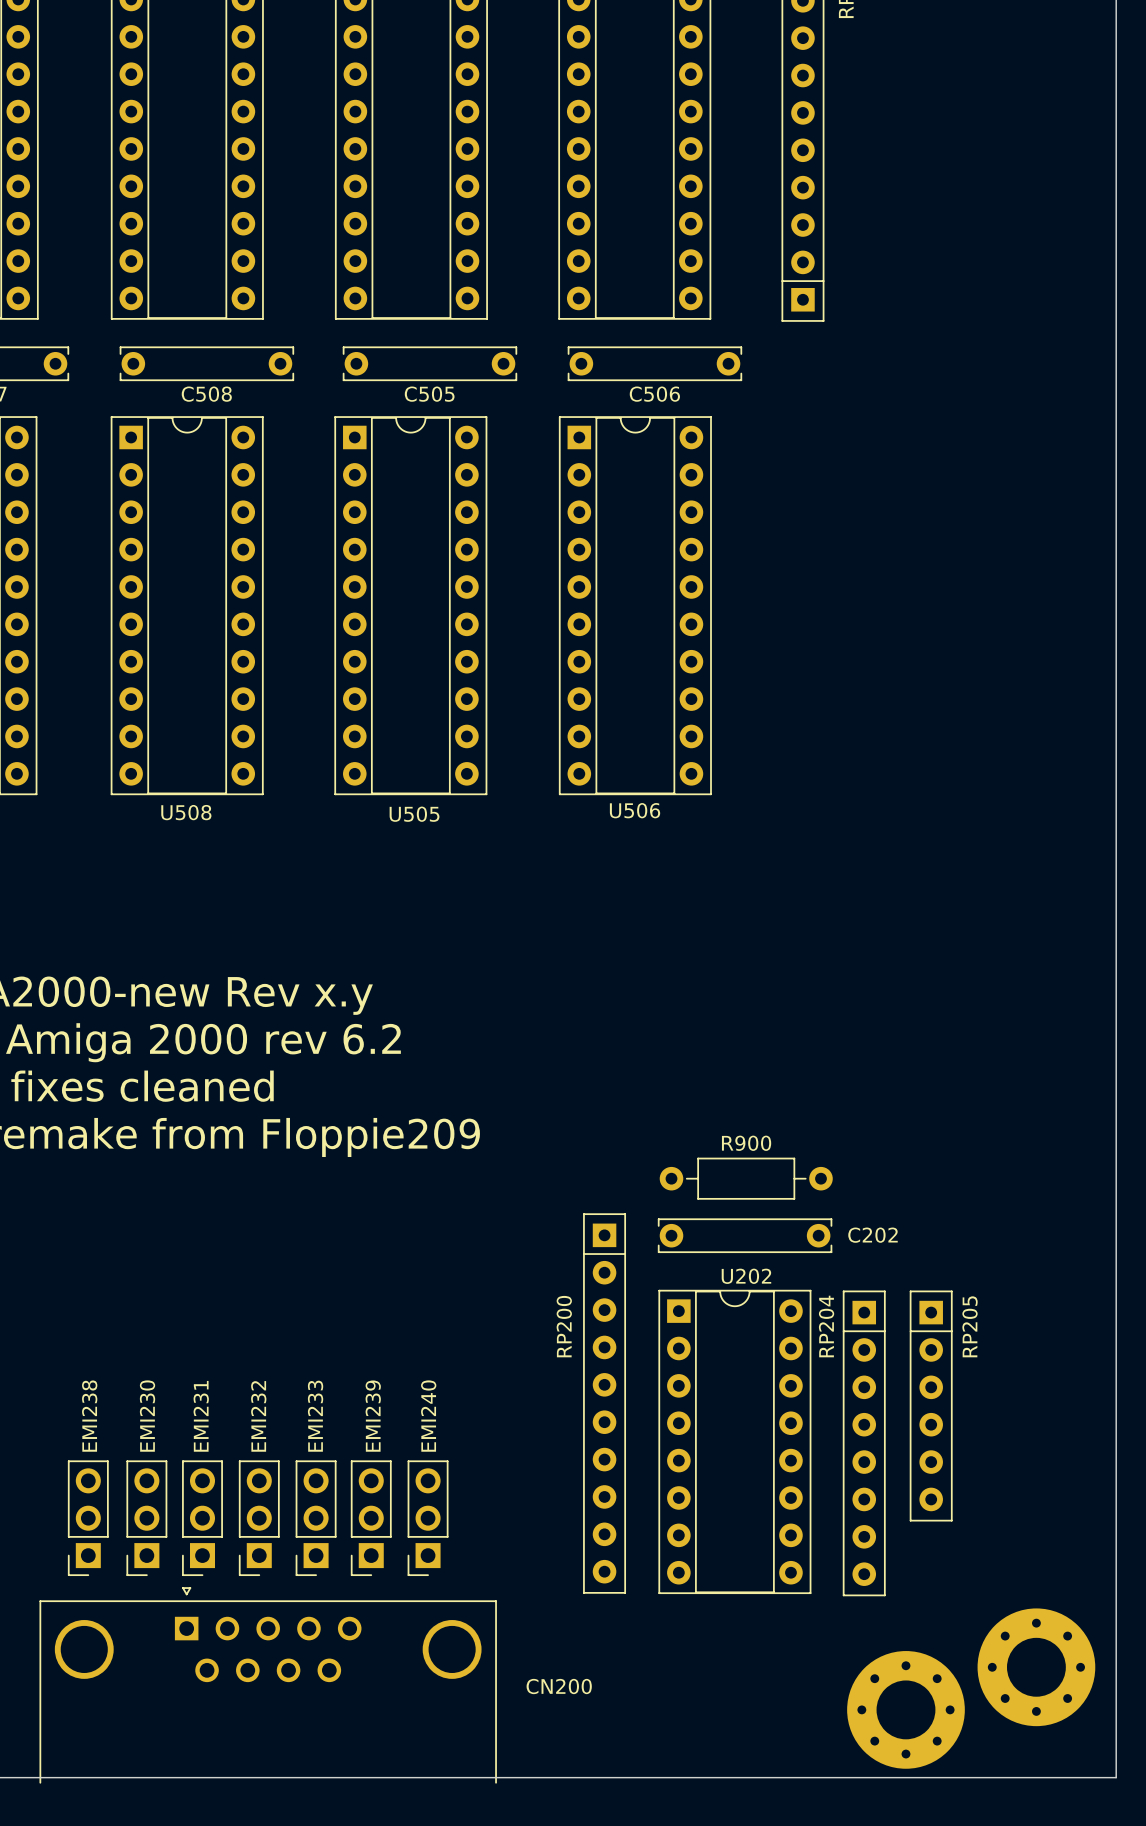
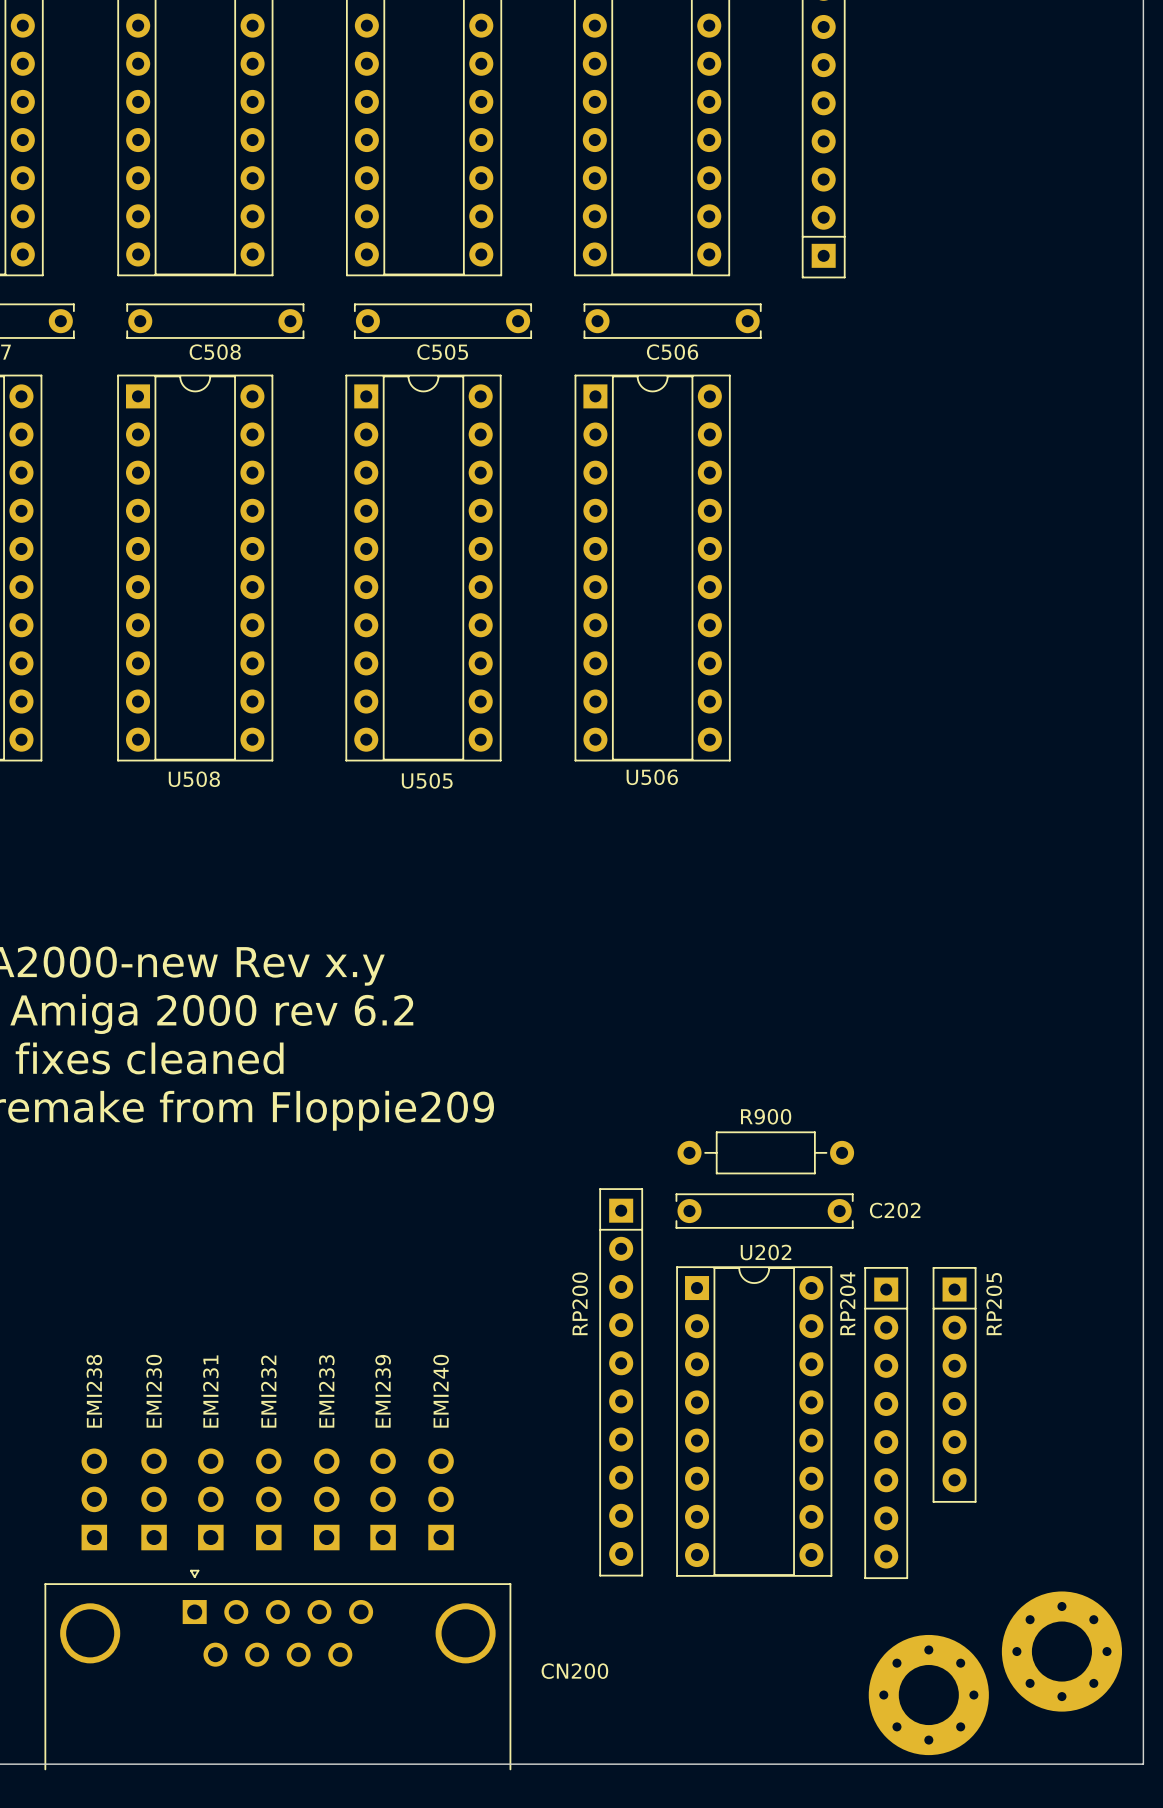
EMI238 footprint: [67, 1460, 109, 1577] -> [81, 1448, 108, 1551]
EMI230 footprint: [126, 1460, 168, 1577] -> [141, 1448, 167, 1551]
EMI231 footprint: [182, 1460, 223, 1577] -> [198, 1448, 224, 1551]
EMI232 footprint: [238, 1460, 280, 1577] -> [256, 1448, 282, 1551]
EMI233 footprint: [295, 1460, 337, 1577] -> [314, 1448, 340, 1551]
EMI239 footprint: [350, 1460, 392, 1577] -> [370, 1448, 396, 1551]
EMI240 footprint: [407, 1460, 449, 1577] -> [428, 1448, 454, 1551]

